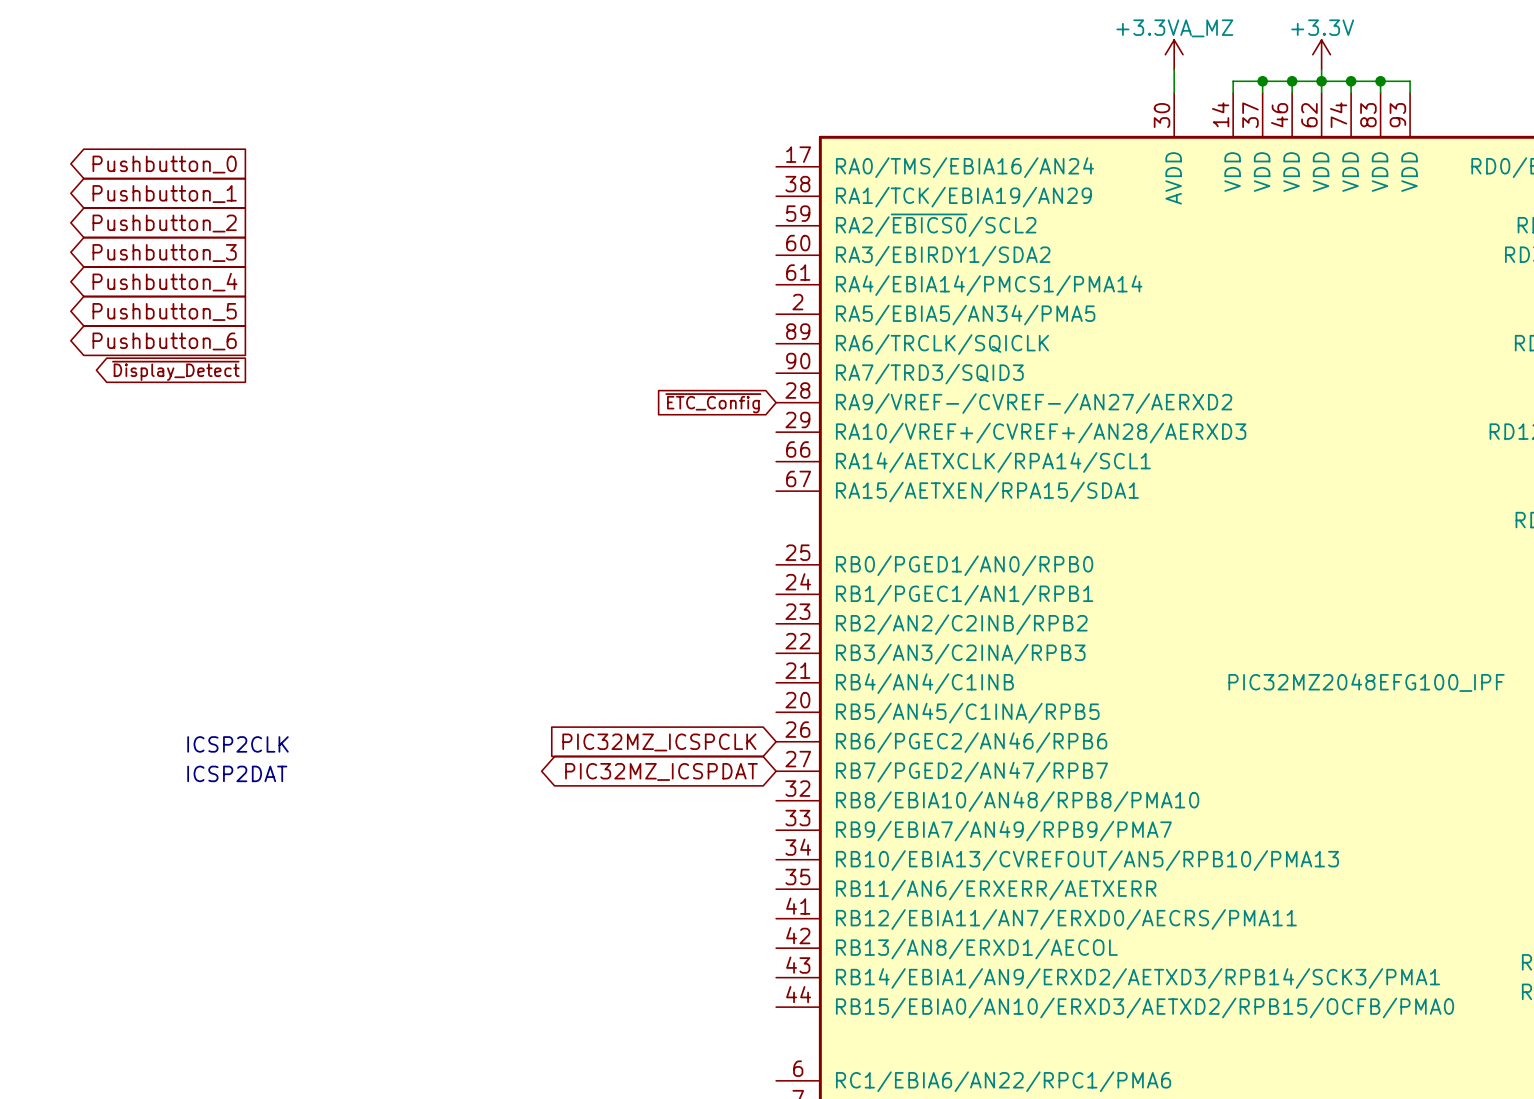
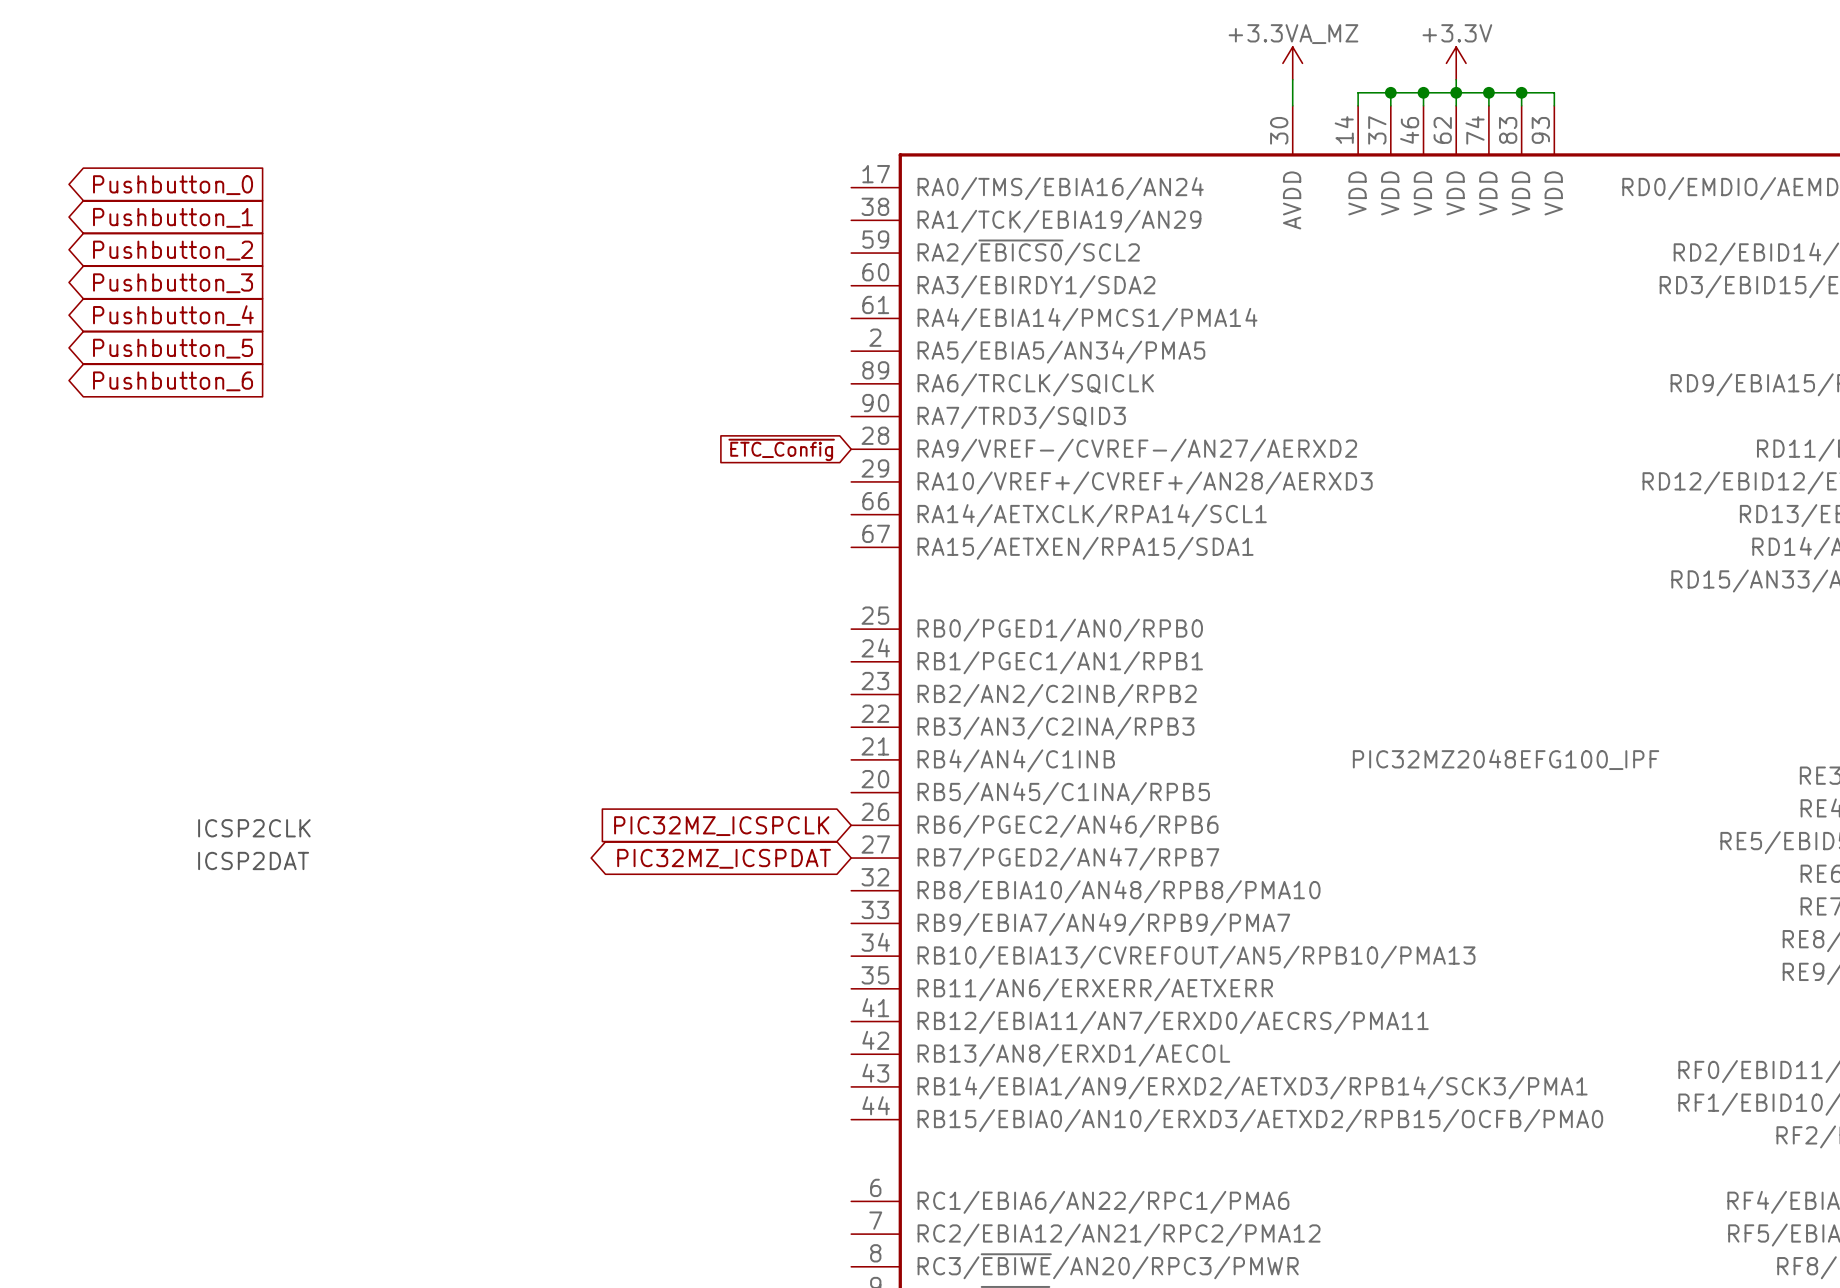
global label: ~{Display_Detect} (175, 370) -> none

